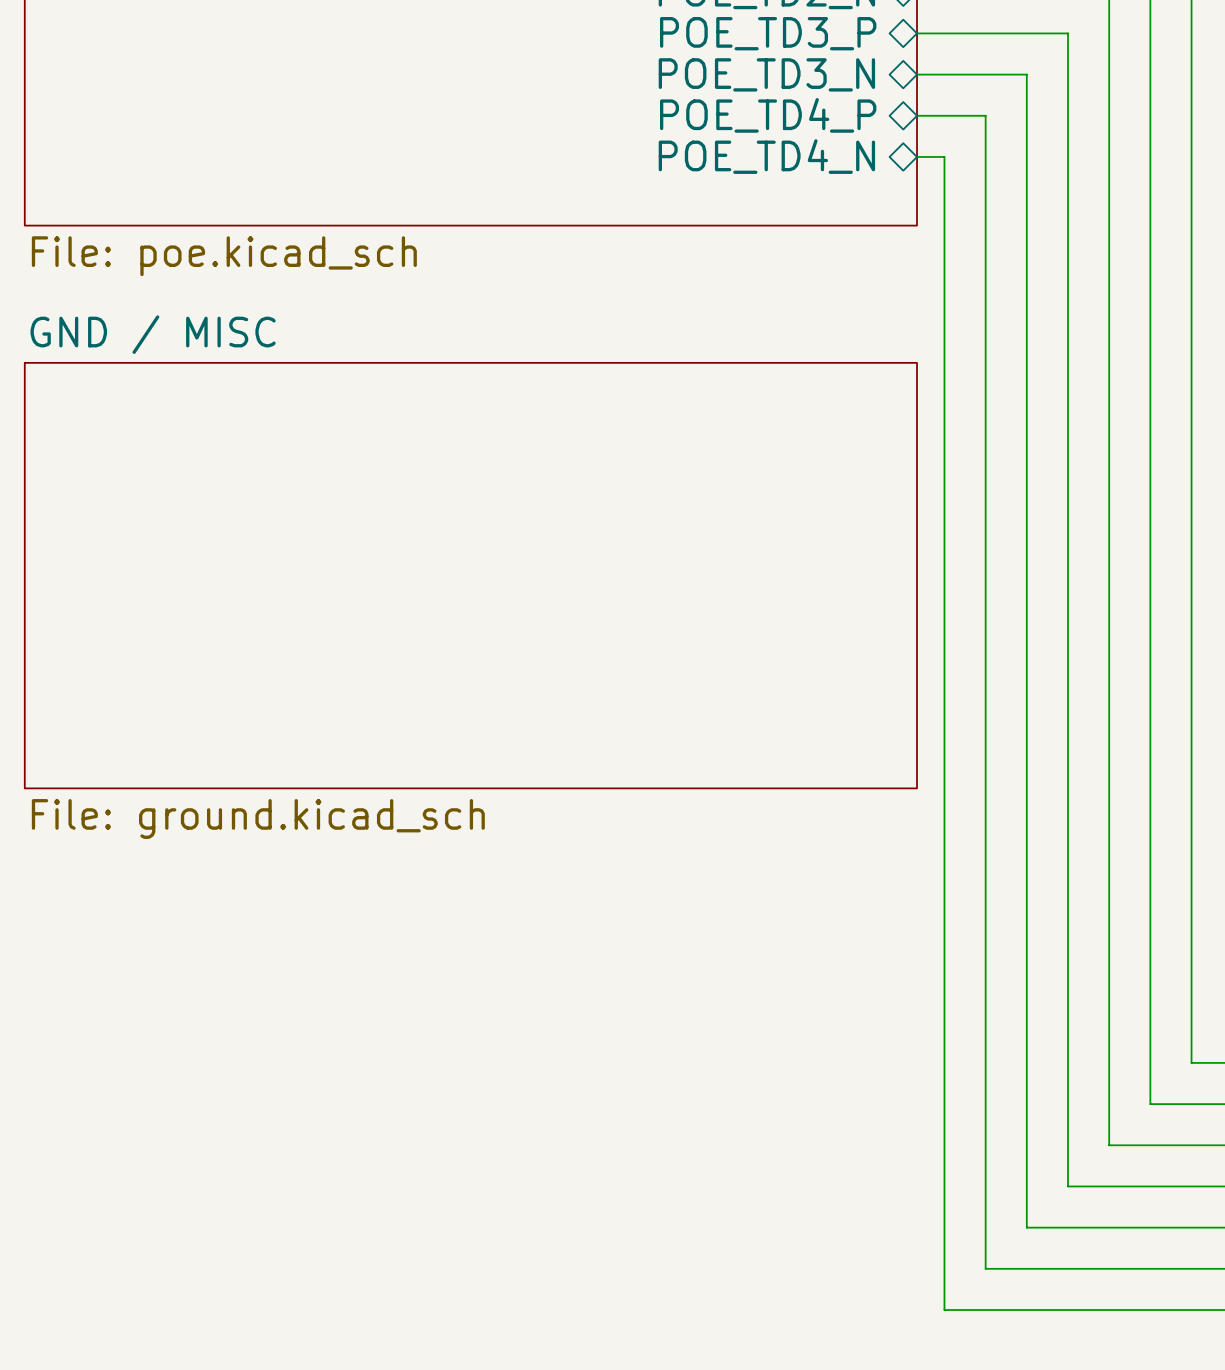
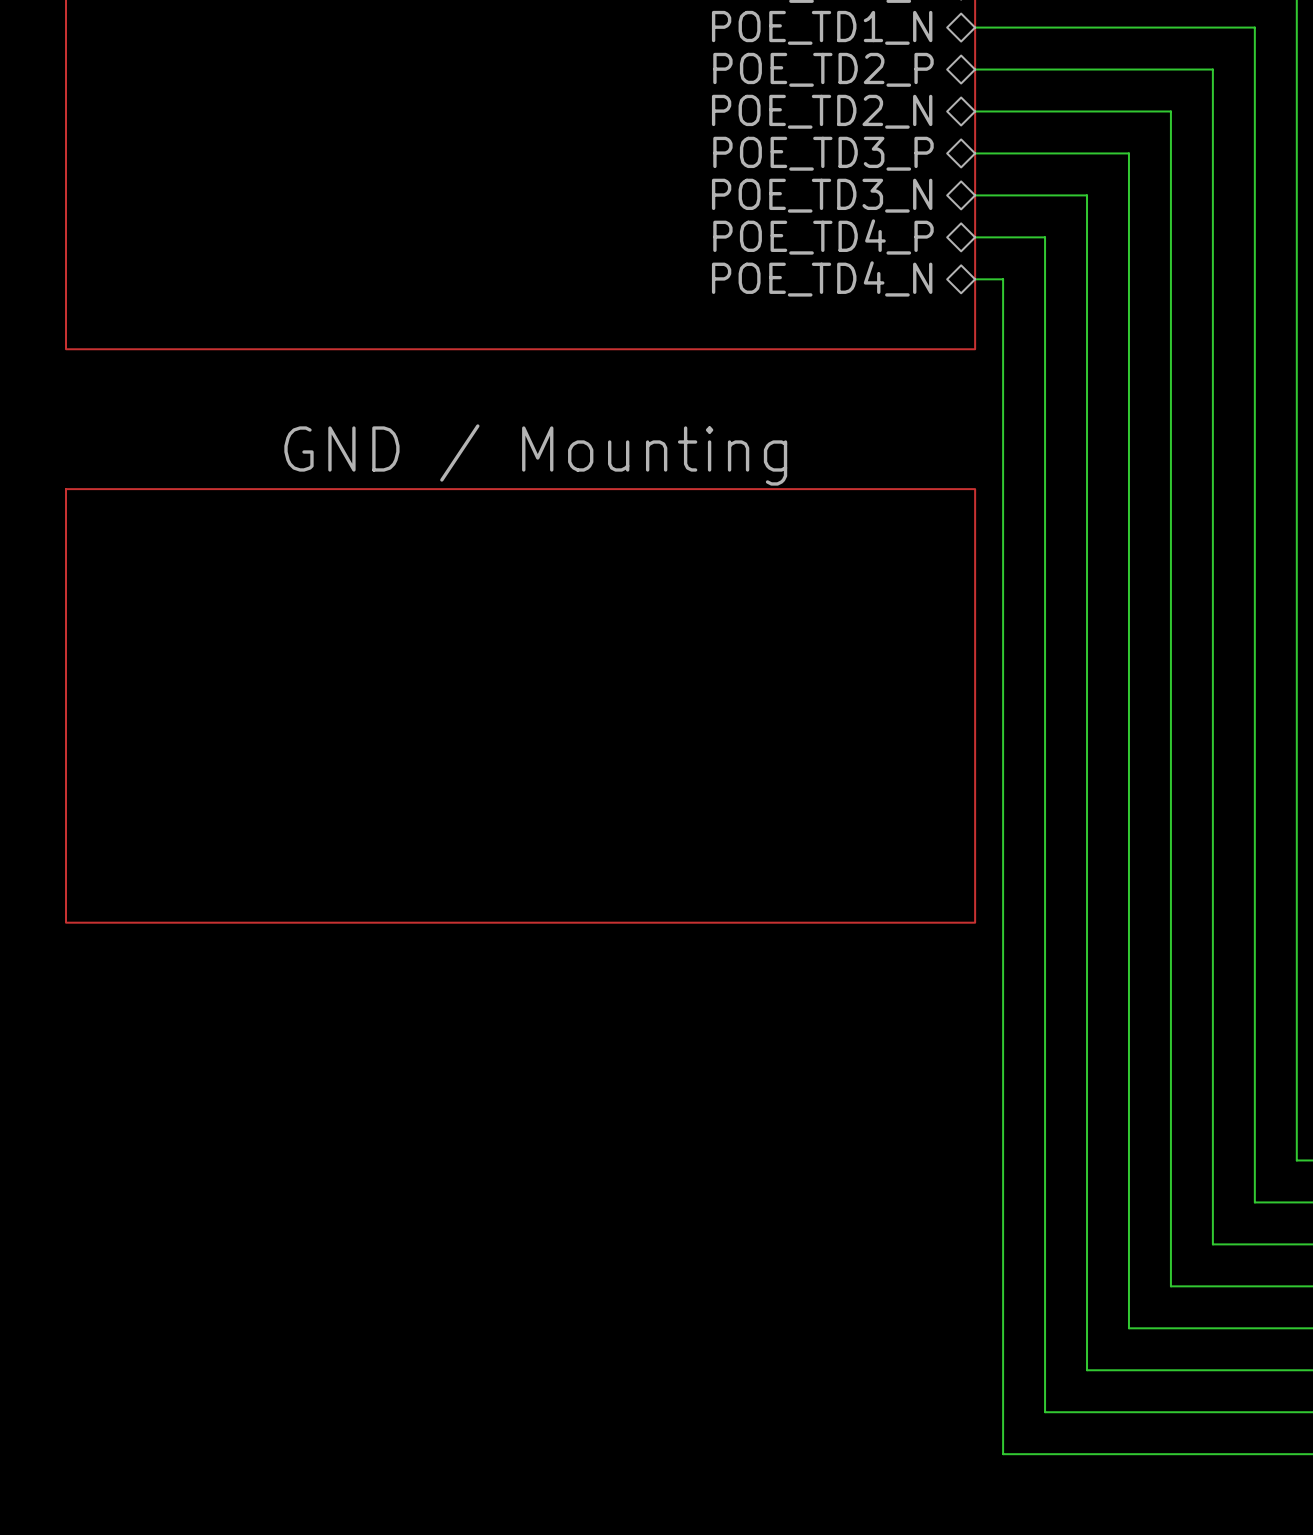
sheet value: File: poe.kicad_sch (224, 256) -> none
sheet GND / MISC name: GND / MISC (153, 334) -> GND / Mounting (535, 454)
sheet GND / MISC value: File: ground.kicad_sch (258, 818) -> none

